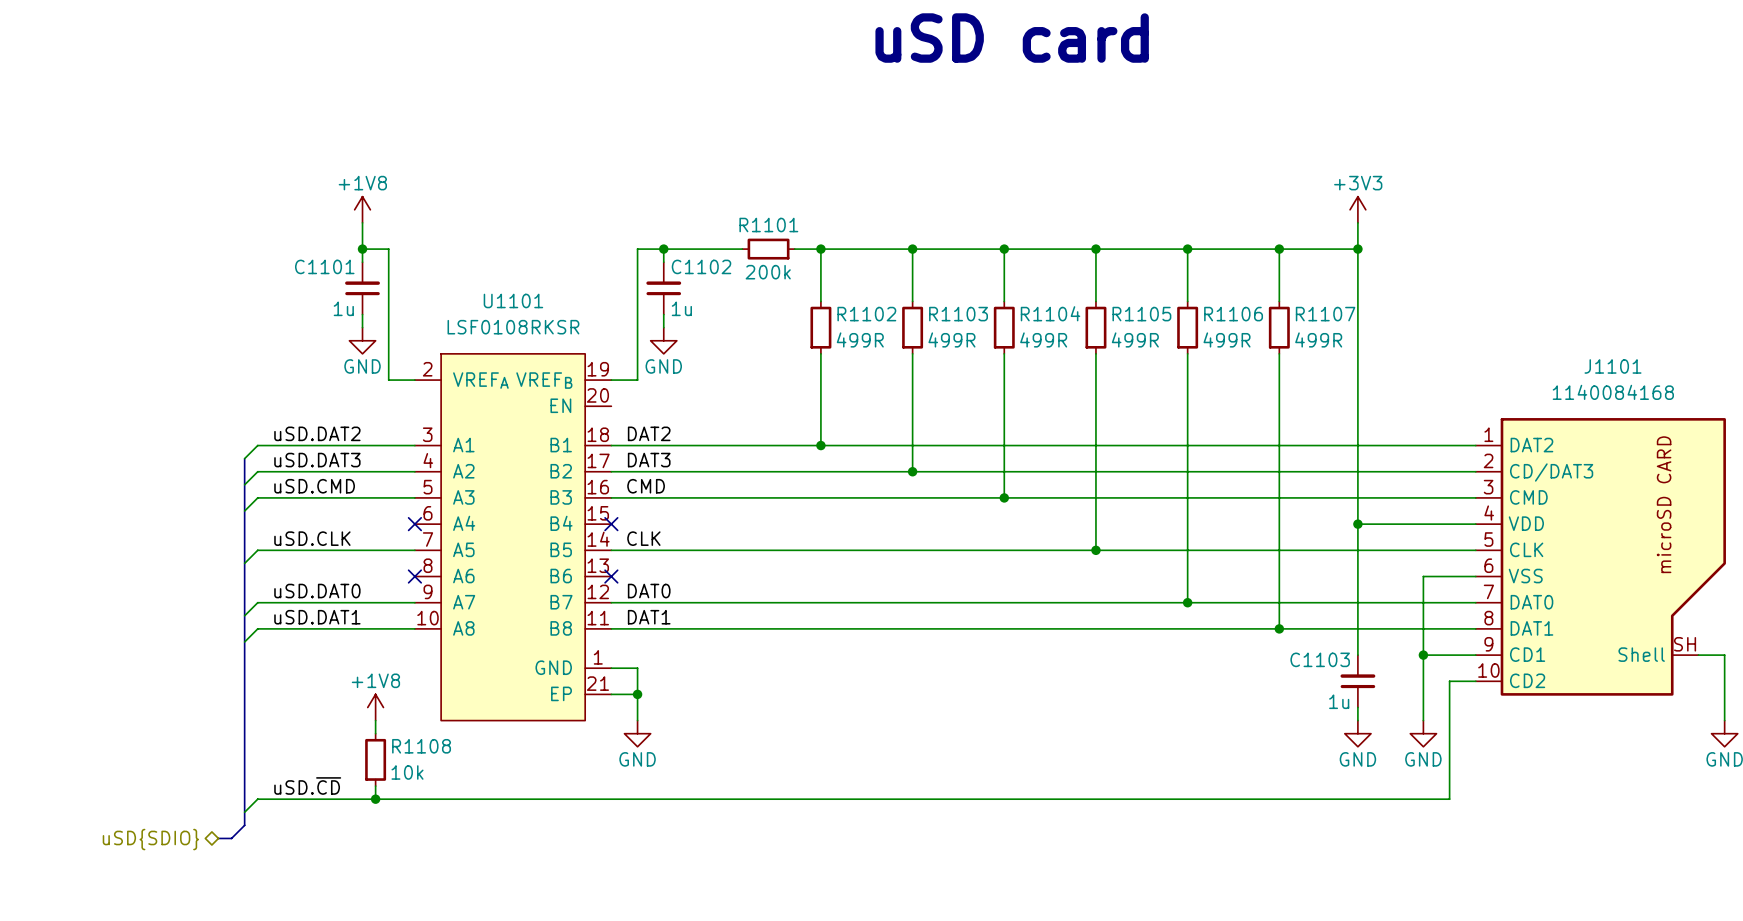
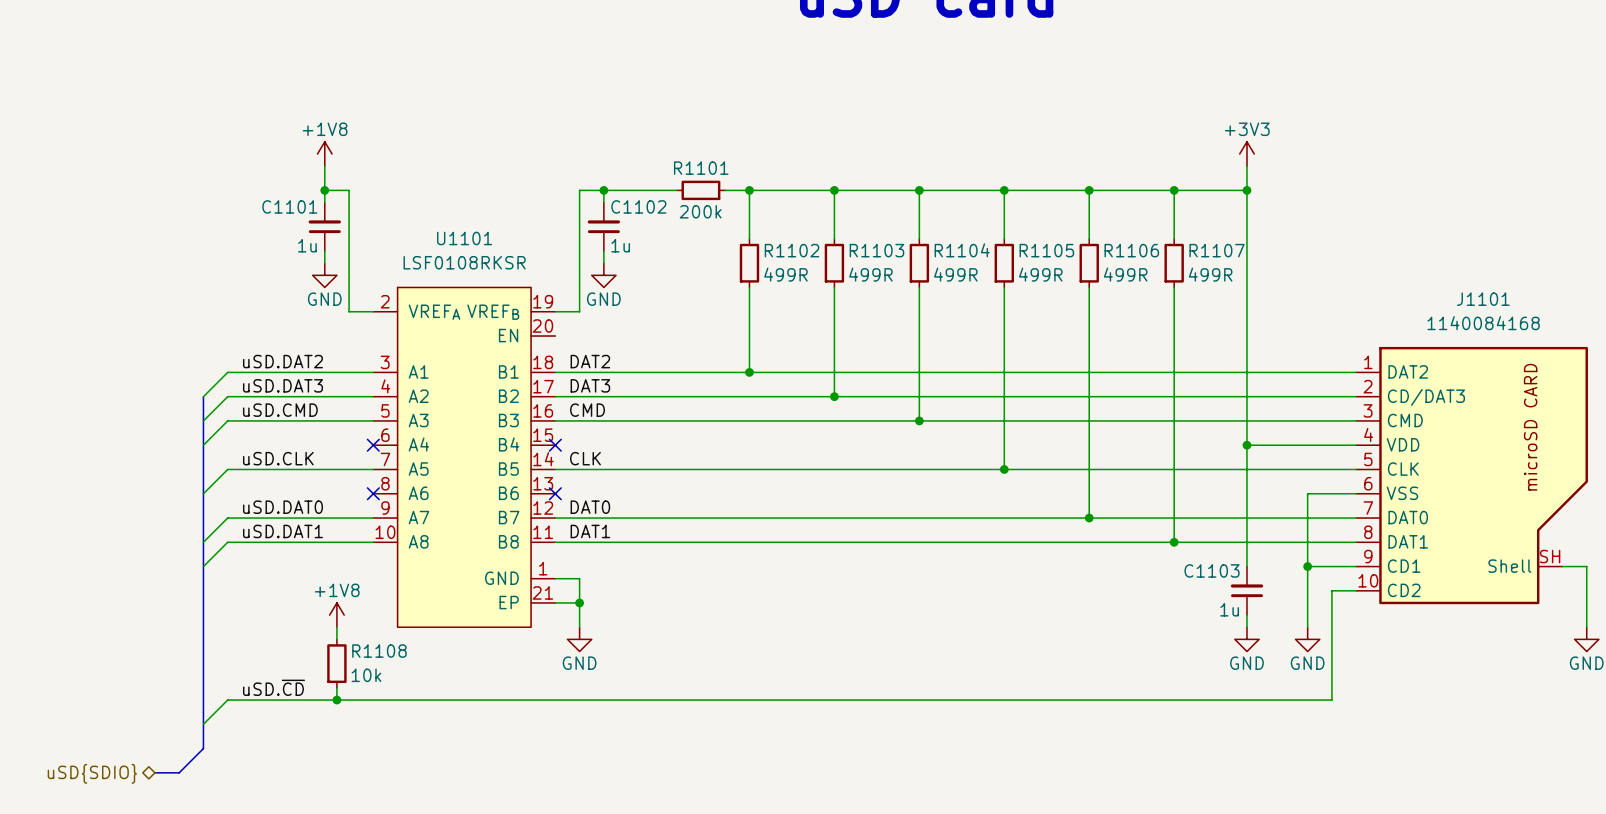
wire: none -> (215, 384) (203, 396)
bus: (244, 458) (244, 825) (231, 838) (218, 838) -> none
bus: none -> (203, 396) (203, 748) (179, 772) (154, 772)
wire: none -> (215, 408) (203, 420)
wire: none -> (215, 433) (203, 445)
wire: none -> (215, 481) (203, 493)
wire: none -> (215, 530) (203, 542)
wire: none -> (215, 554) (203, 566)
wire: none -> (215, 712) (203, 724)
hierarchical label position: uSD{SDIO} (150, 839) -> uSD{SDIO} (92, 773)

